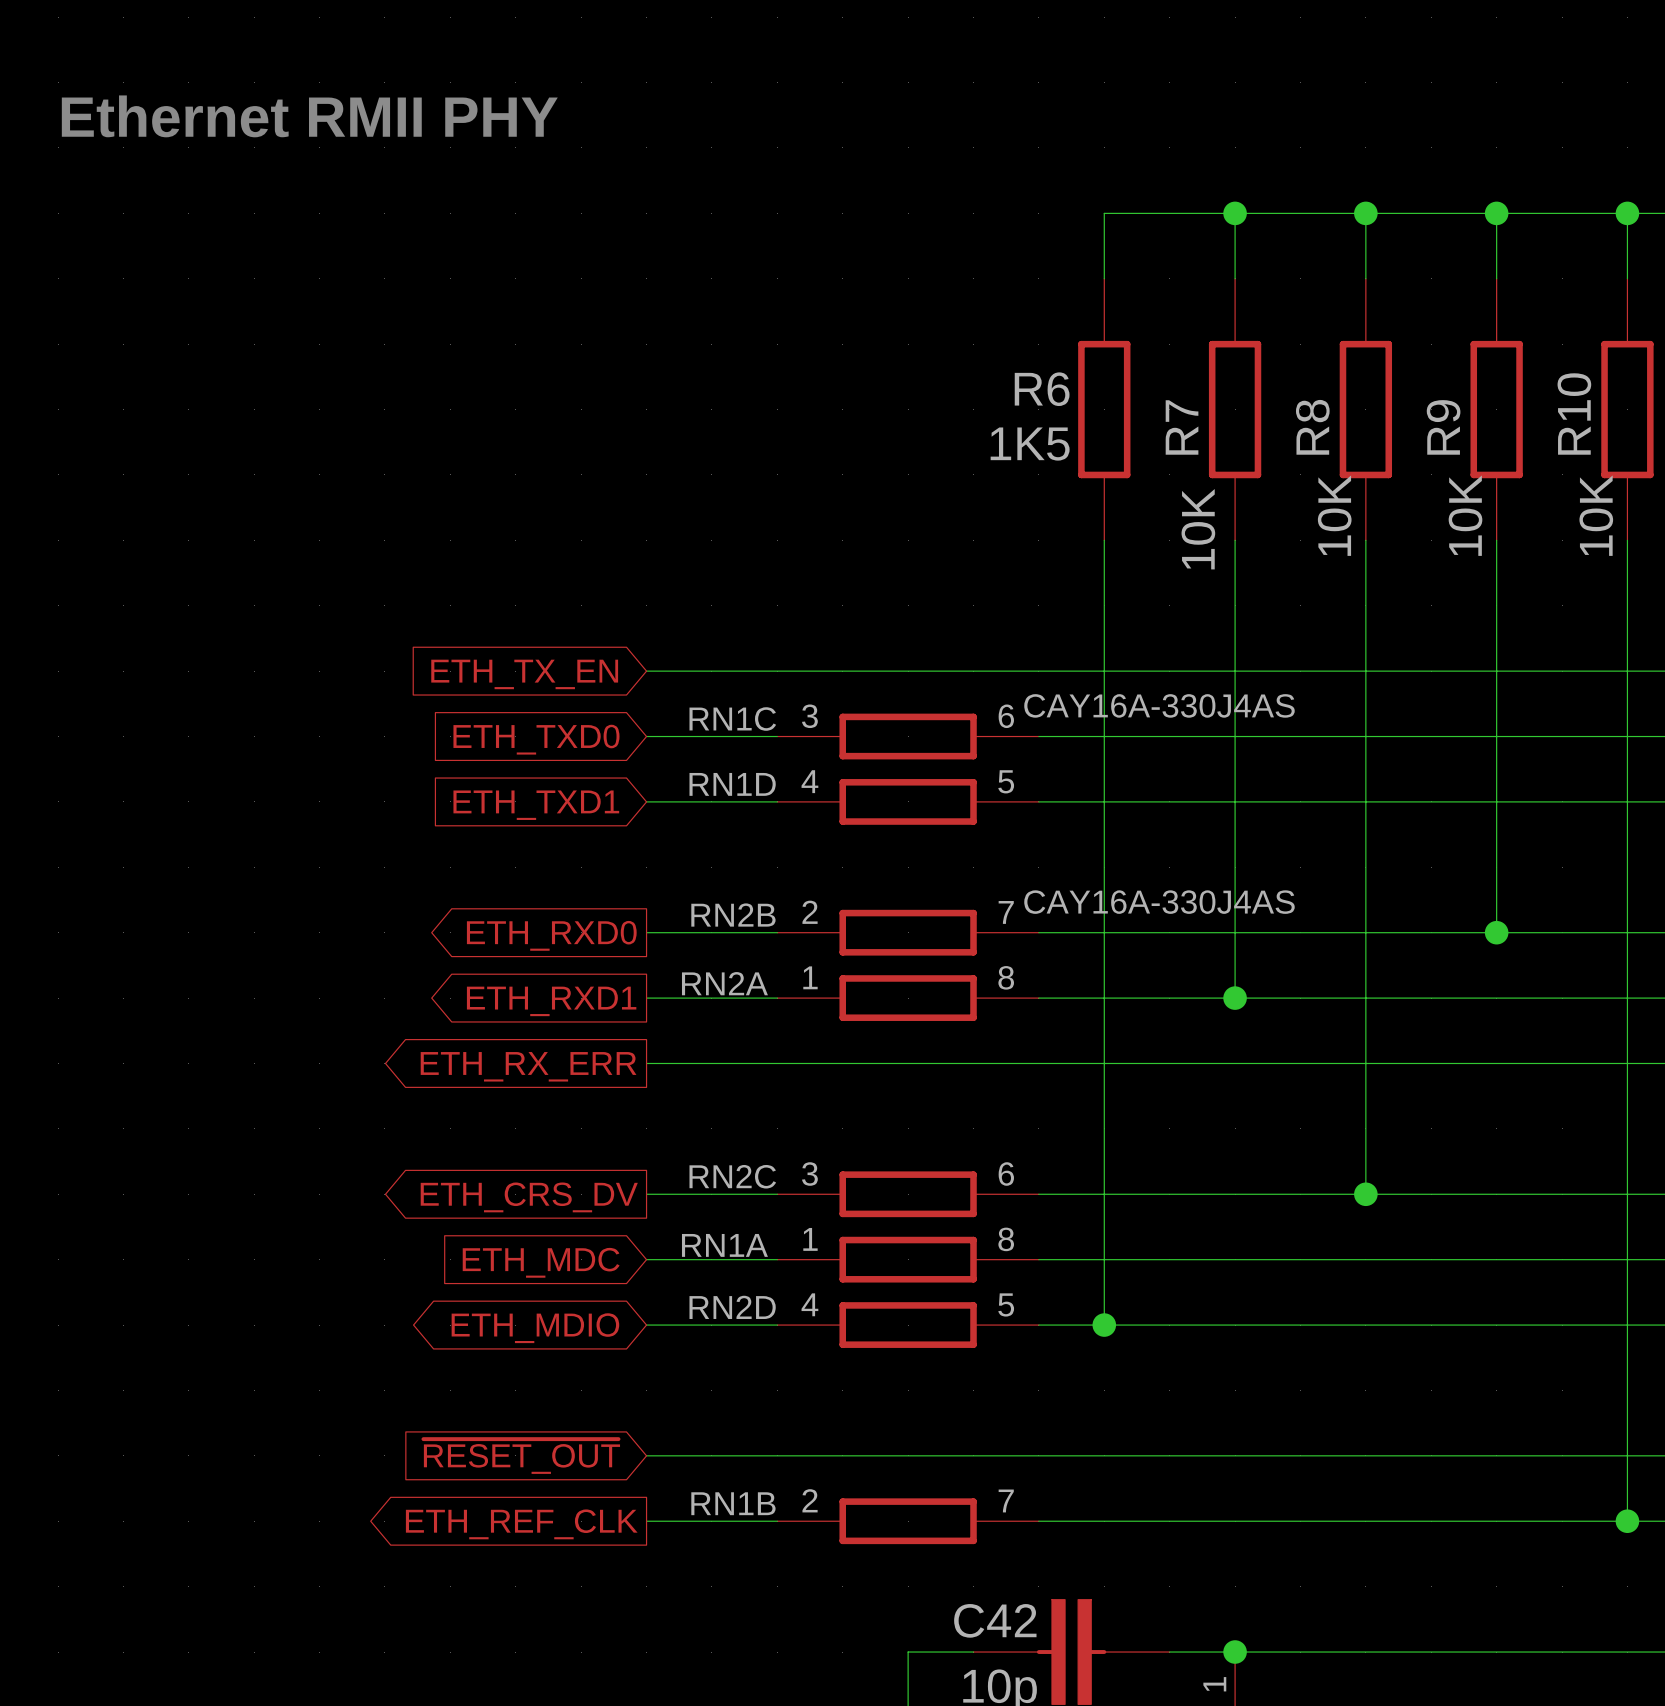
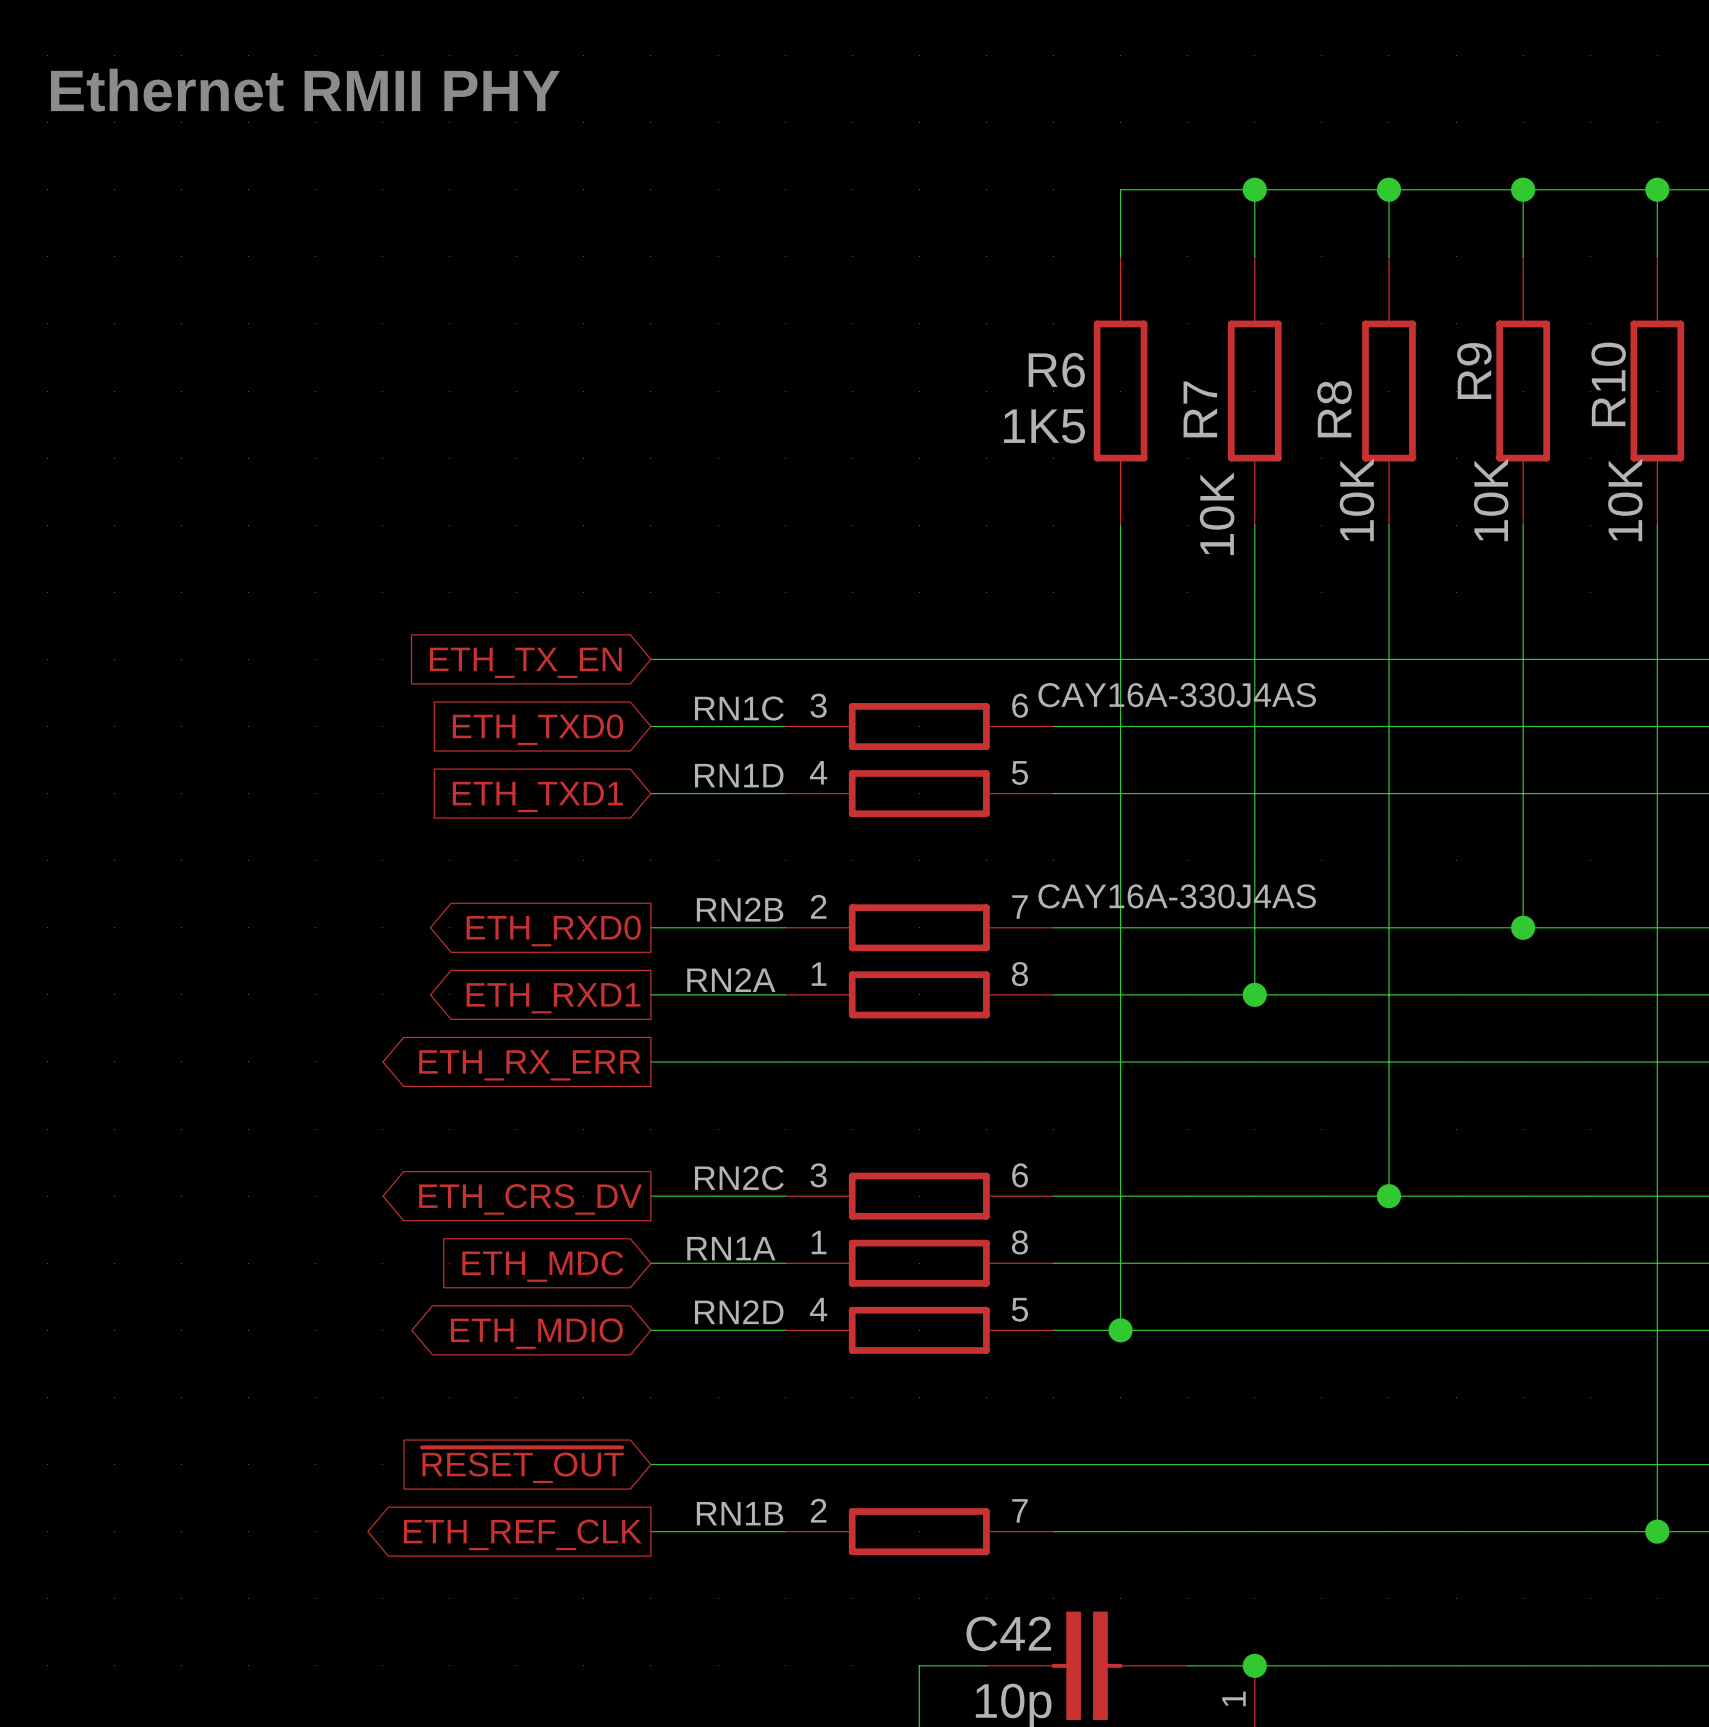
R10 name position: R10 (1574, 413) -> R10 (1608, 384)
R9 name position: R9 (1443, 427) -> R9 (1474, 371)

